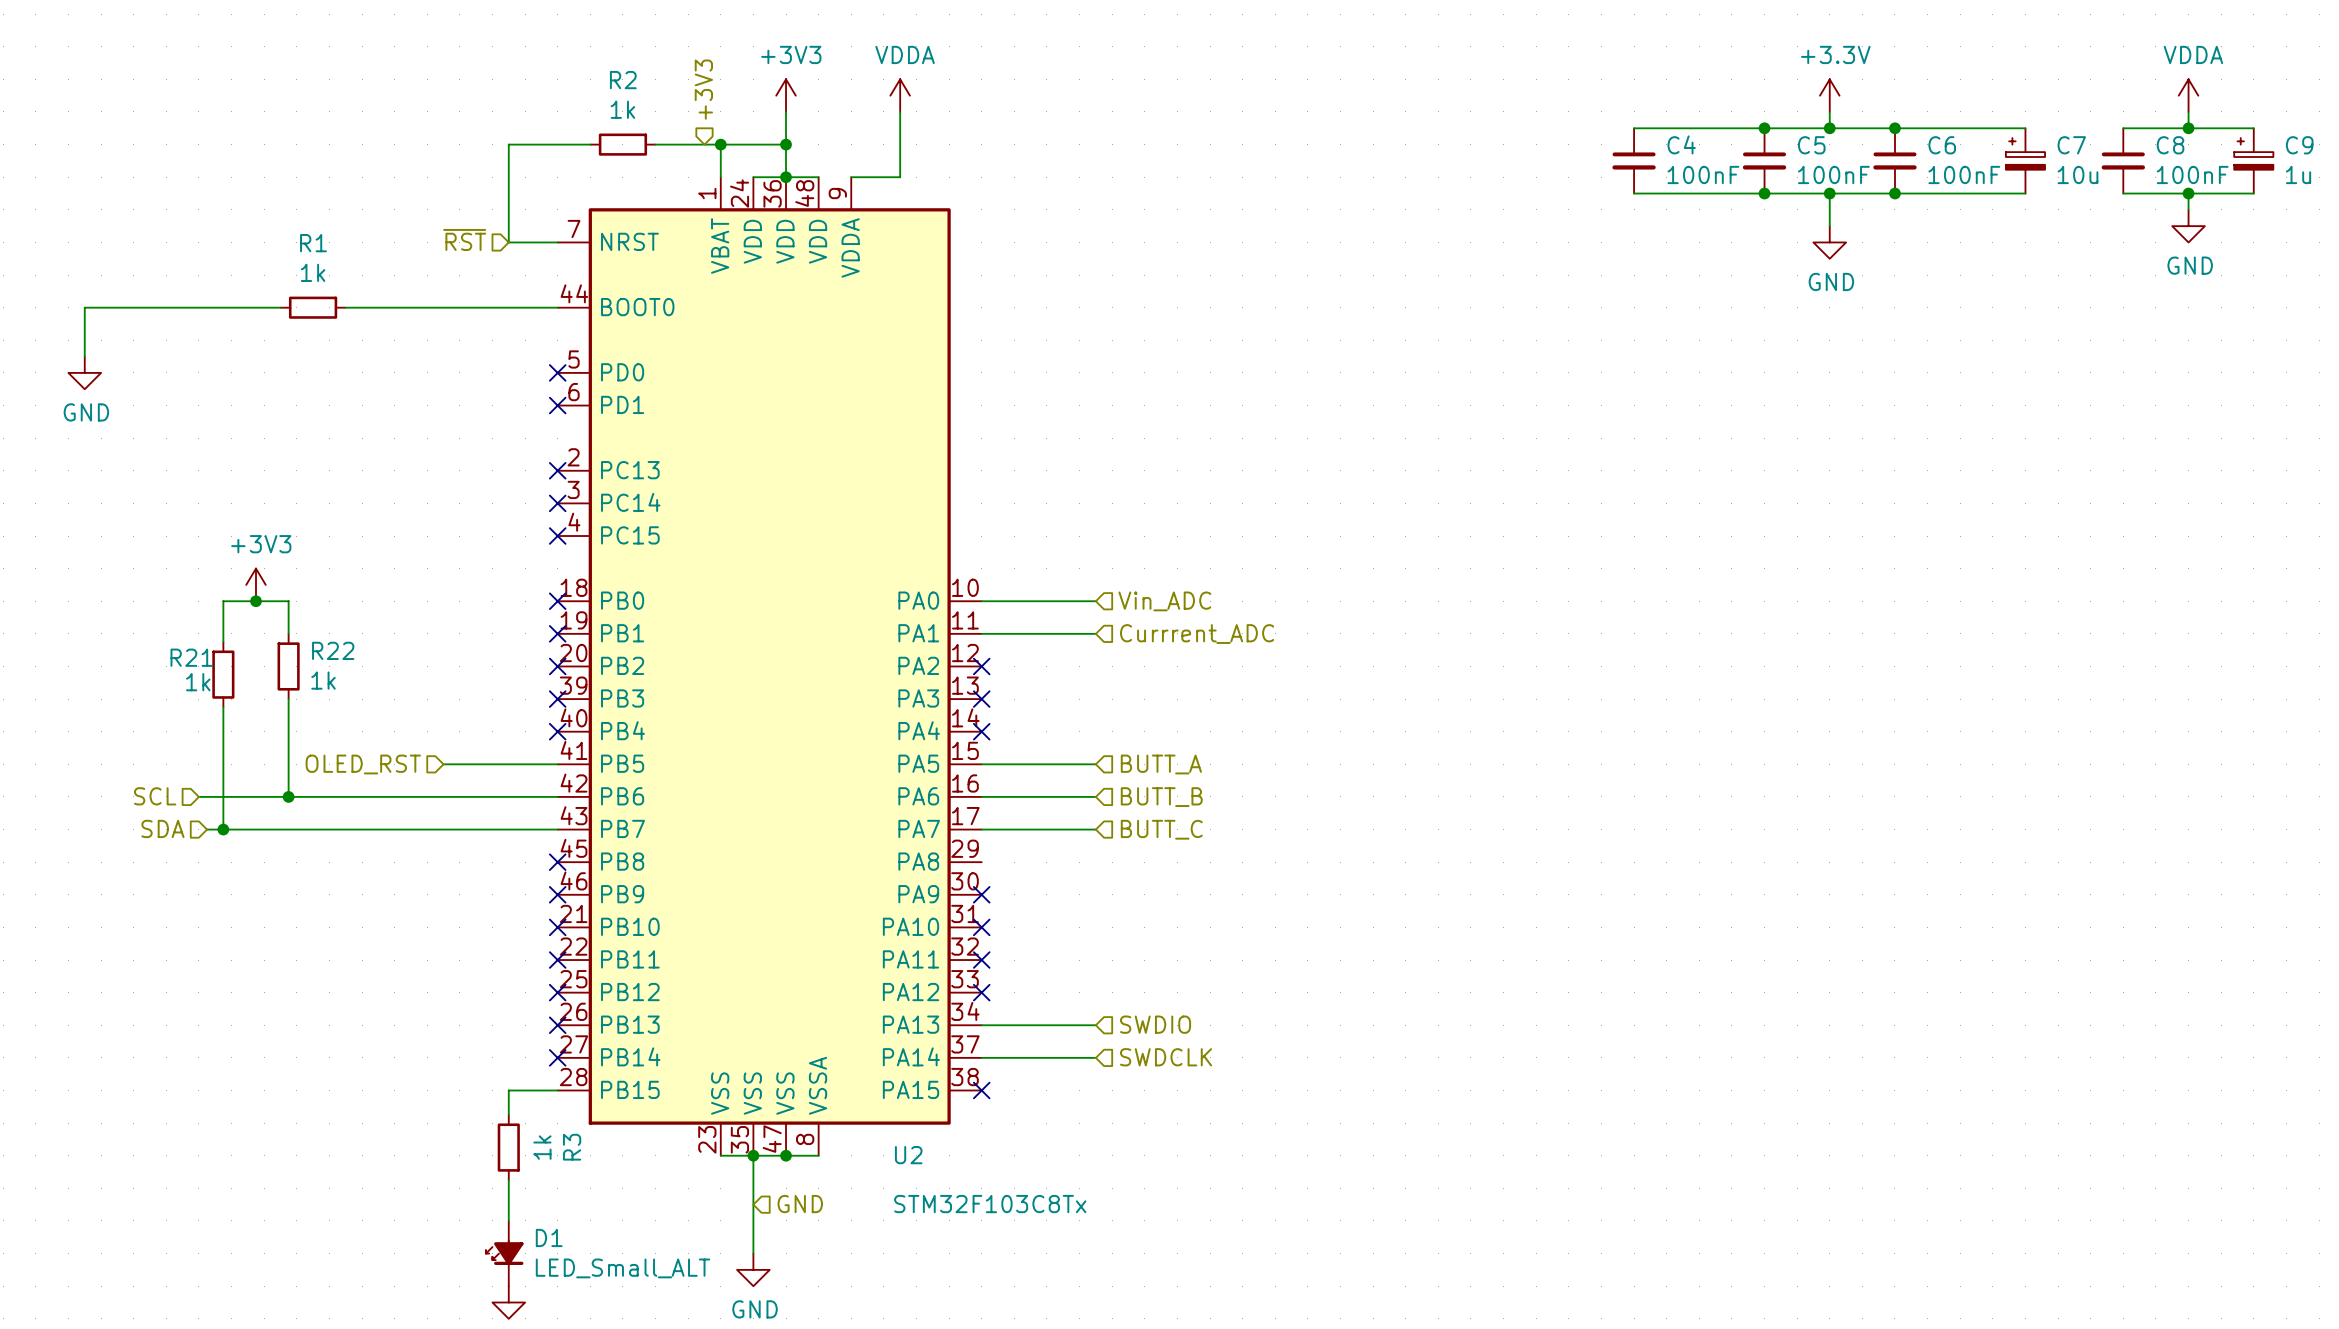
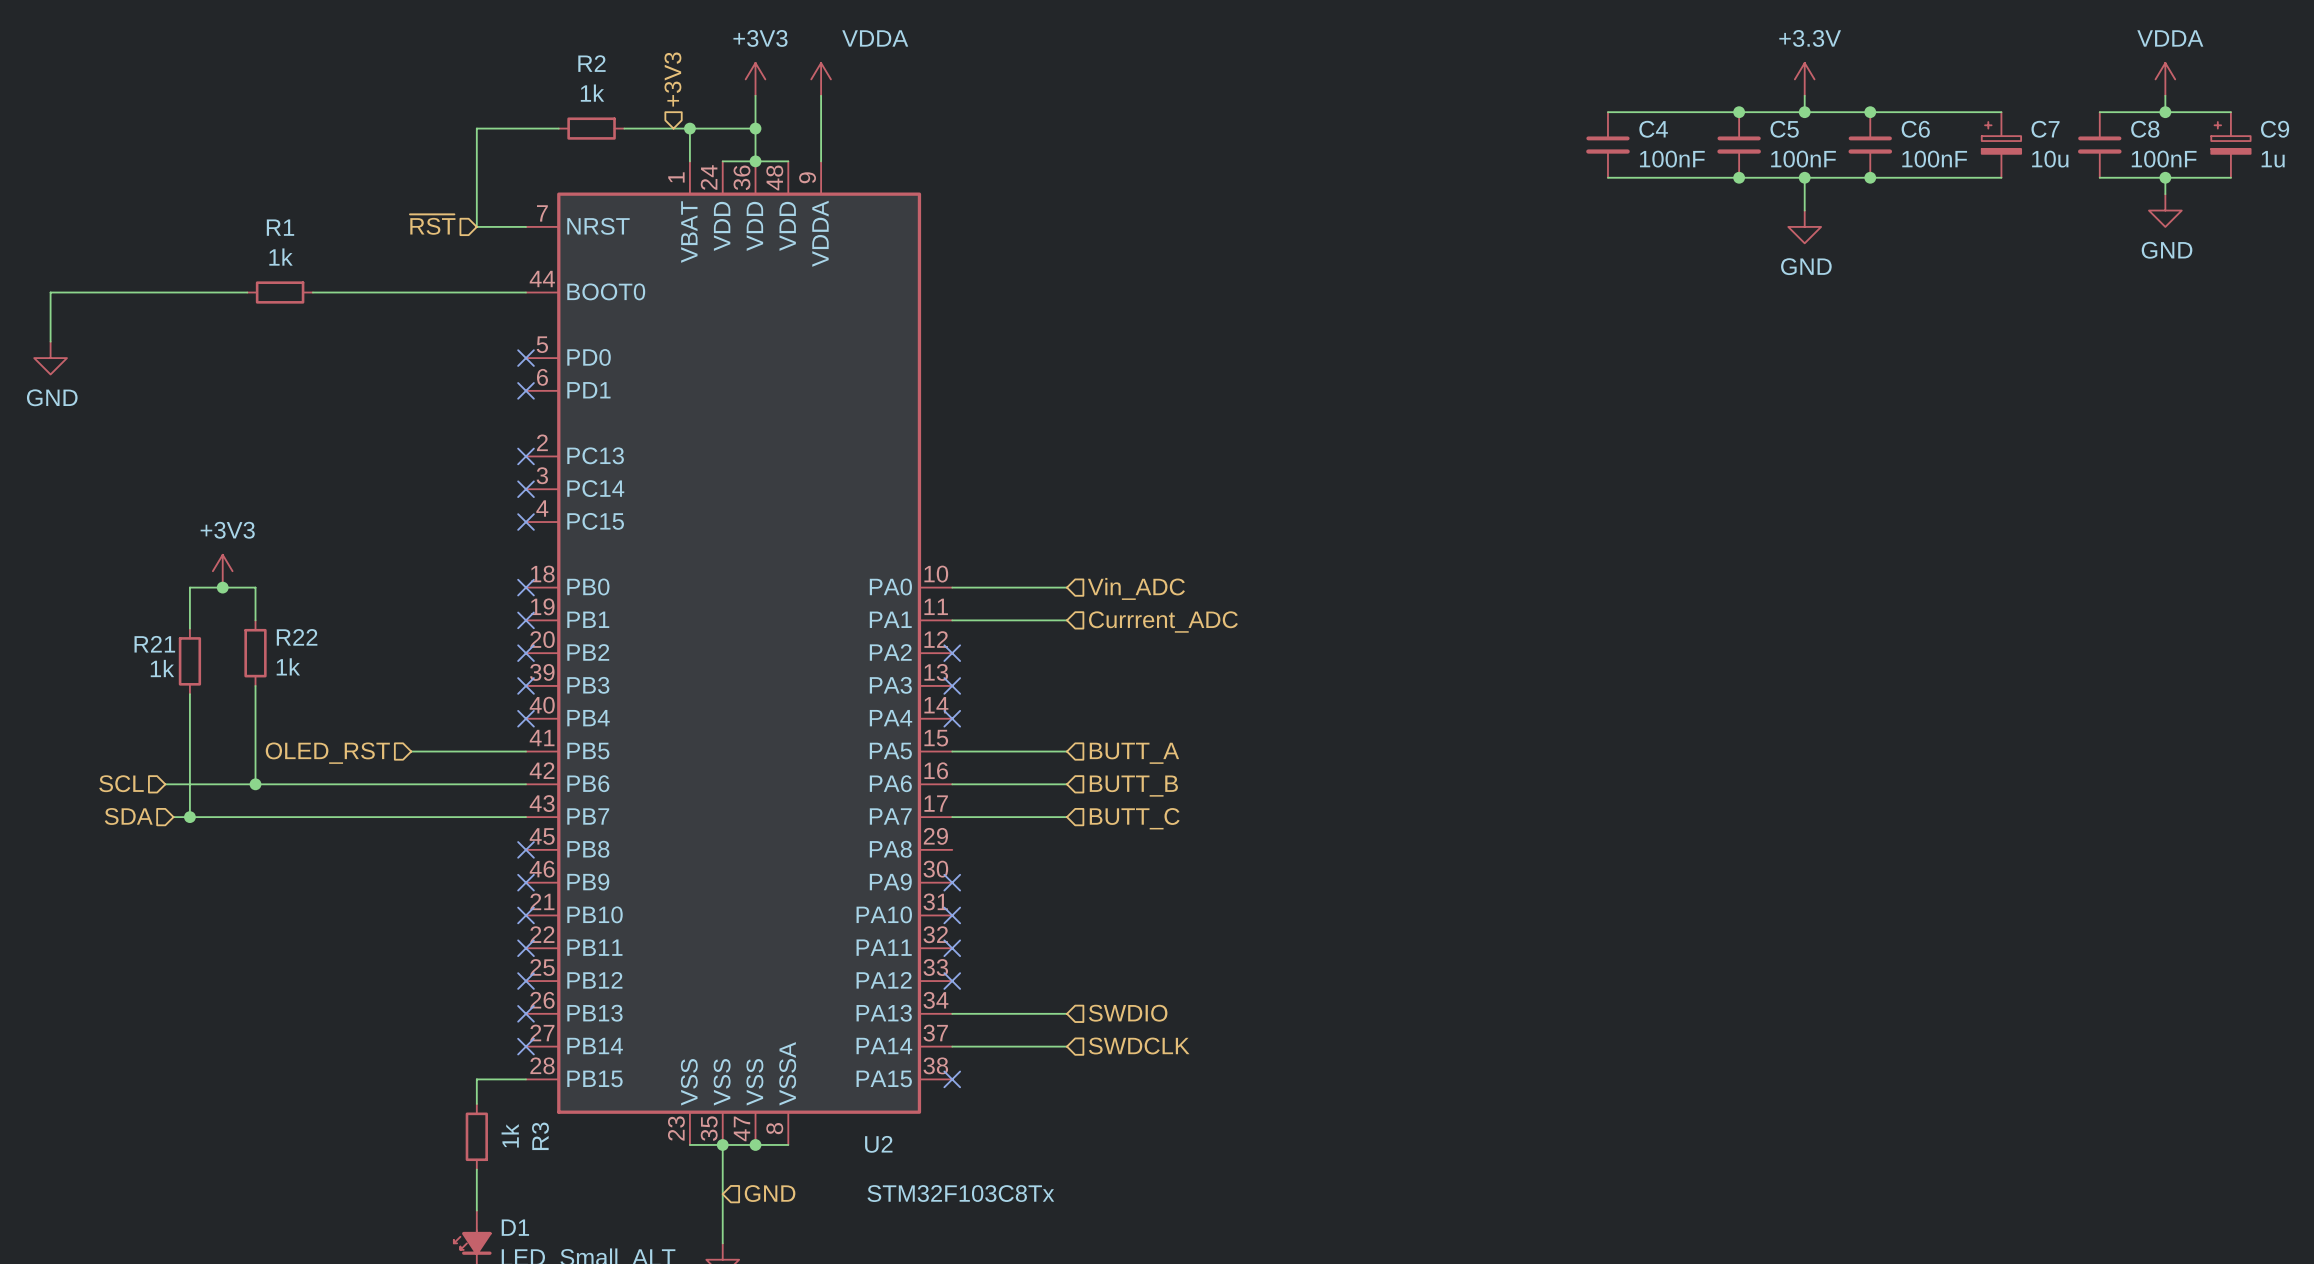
power symbol position: VDDA (900, 95) -> VDDA (821, 79)
wire: (900, 111) (900, 177) (851, 177) -> (821, 95) (821, 161)

